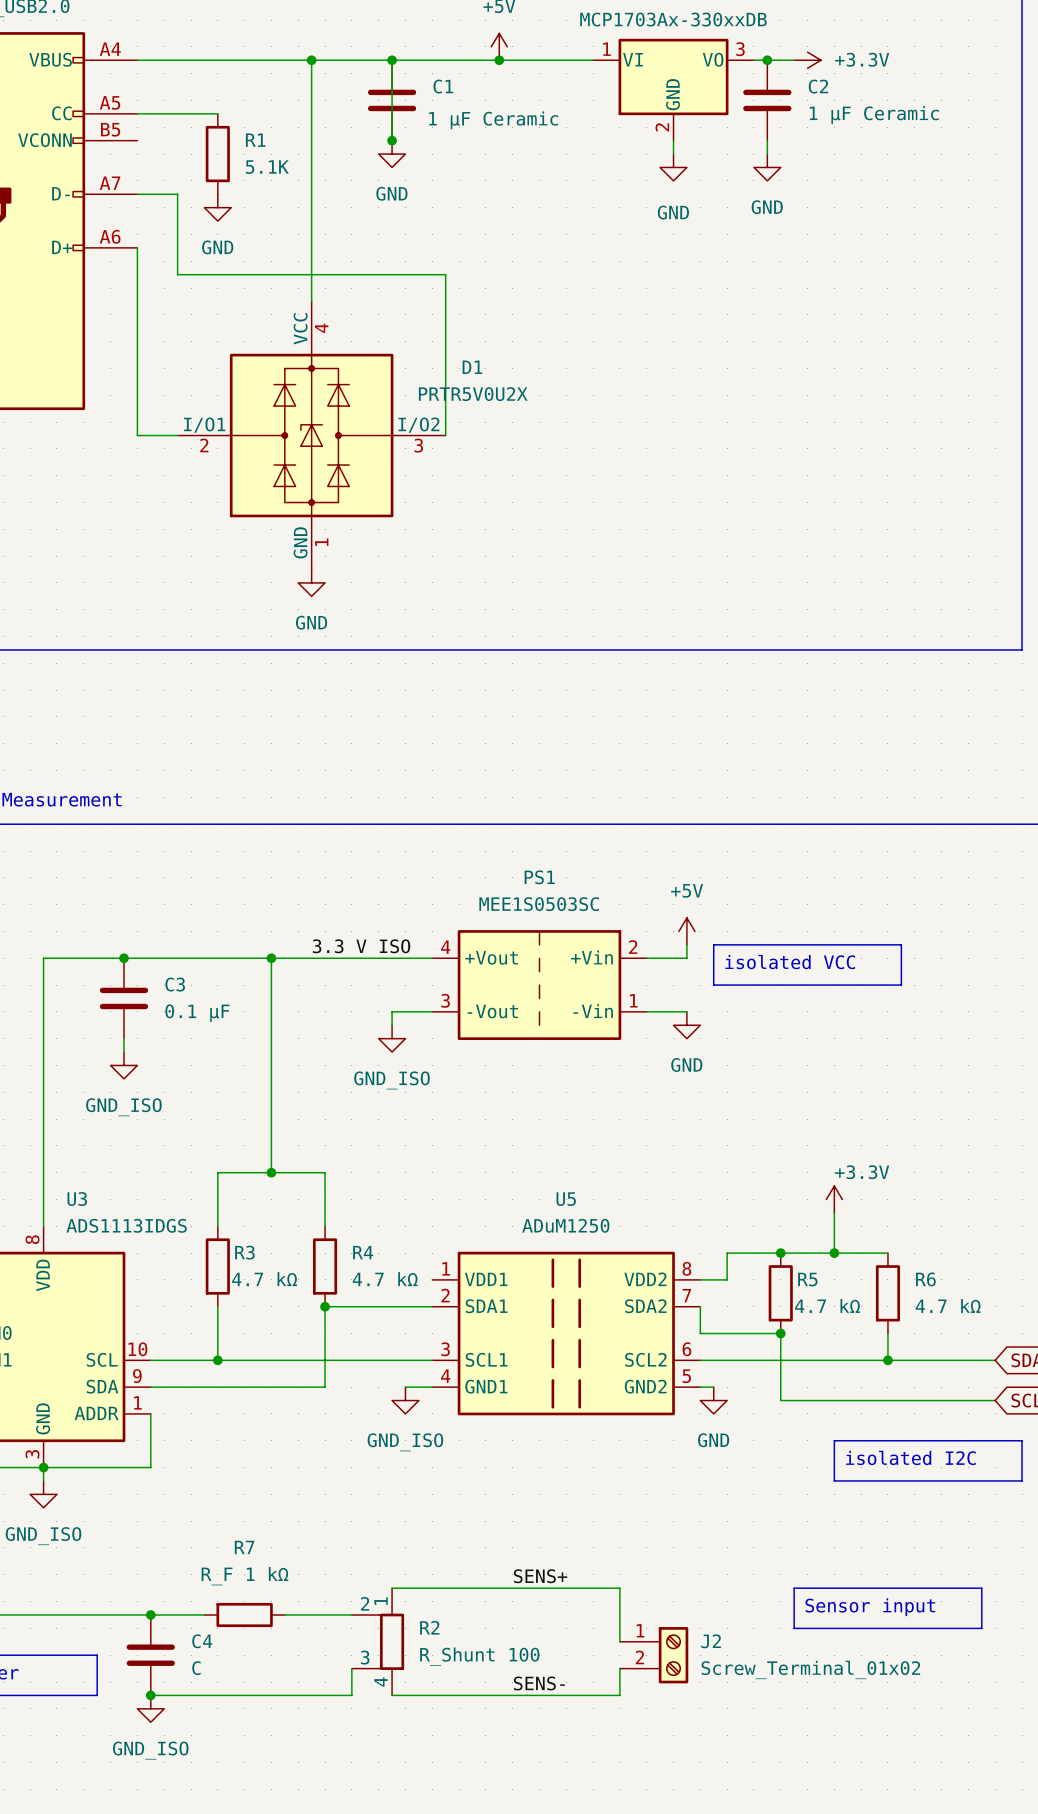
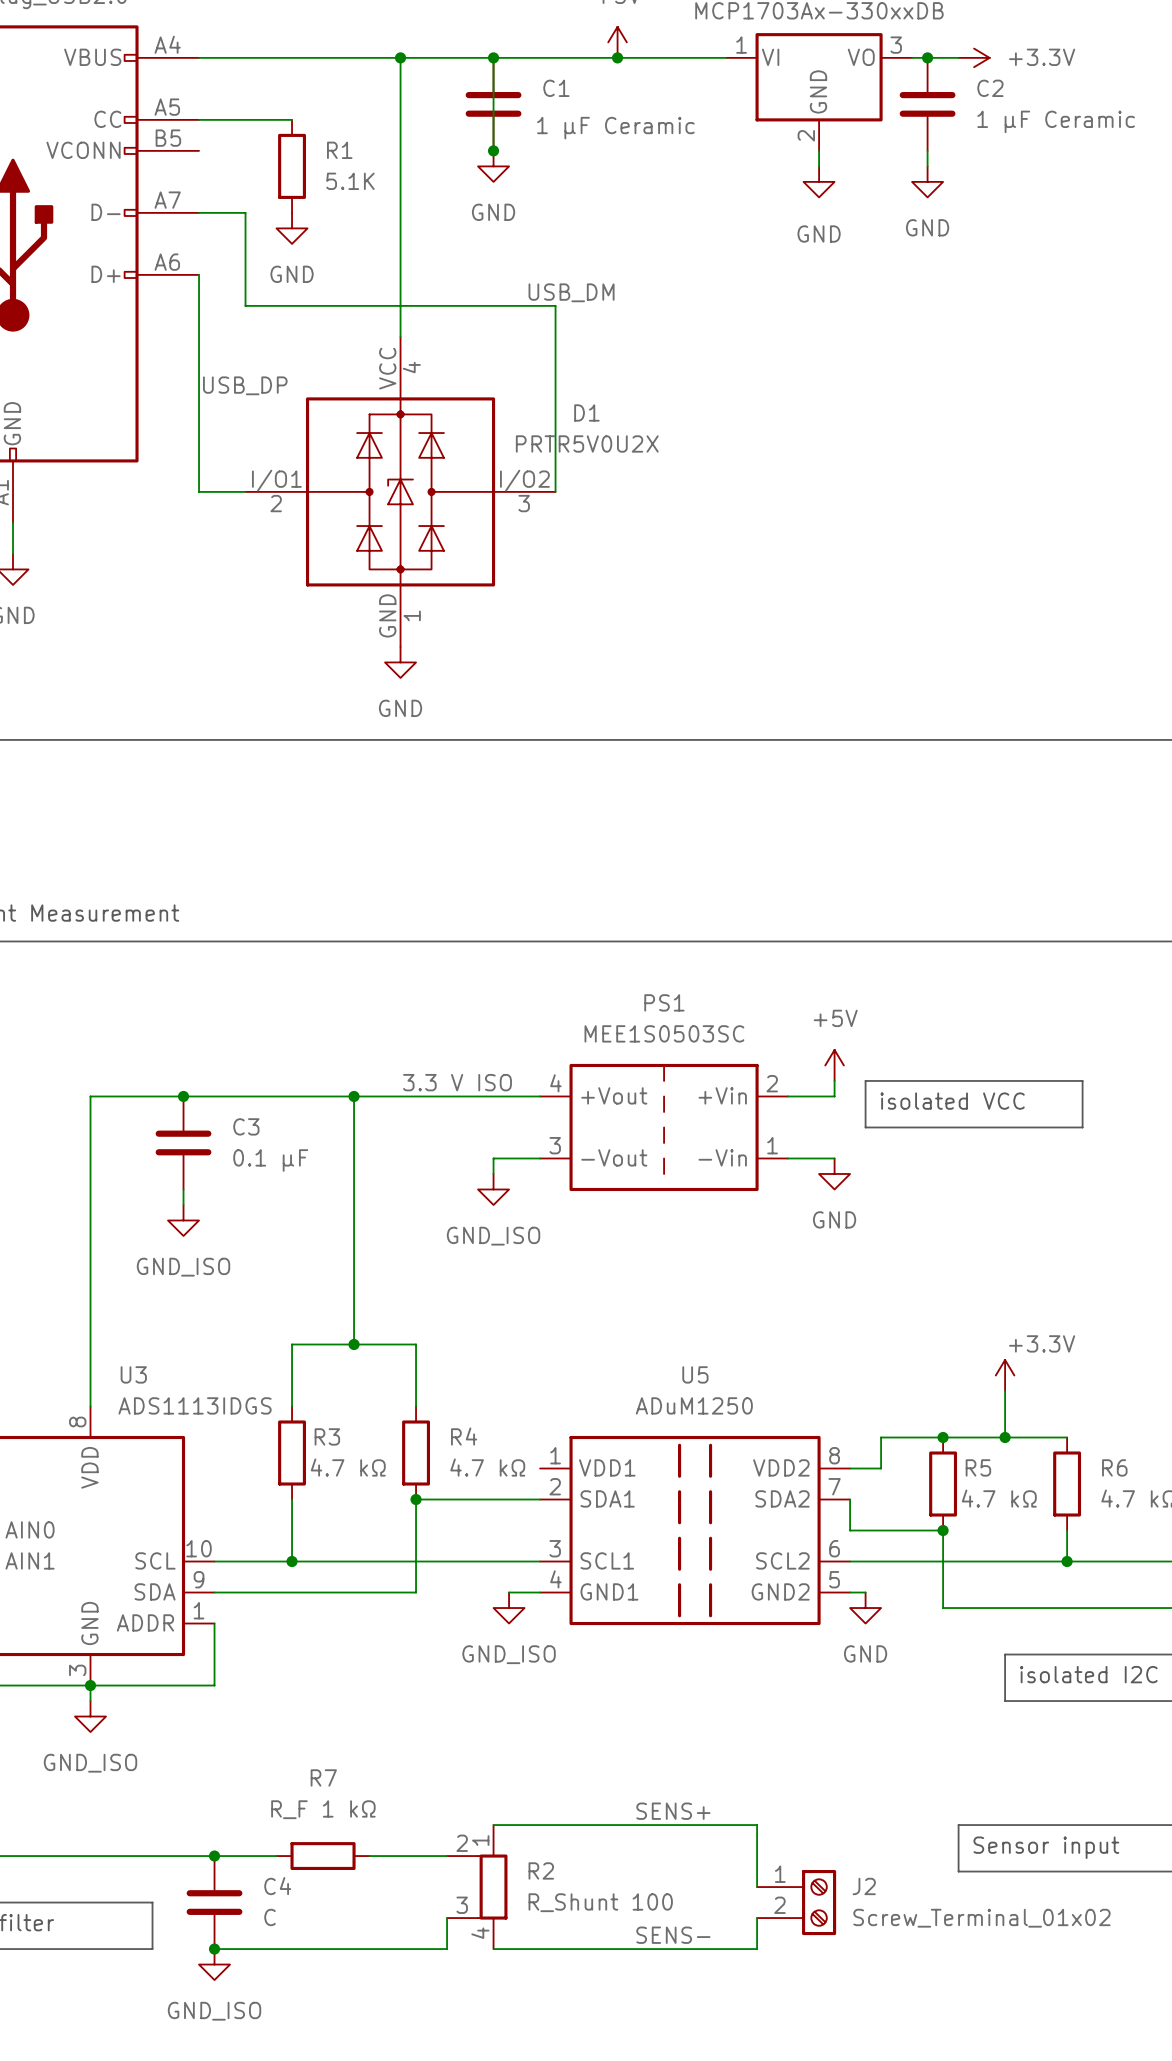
label: none -> USB_DM (571, 292)
label: none -> USB_DP (245, 385)

